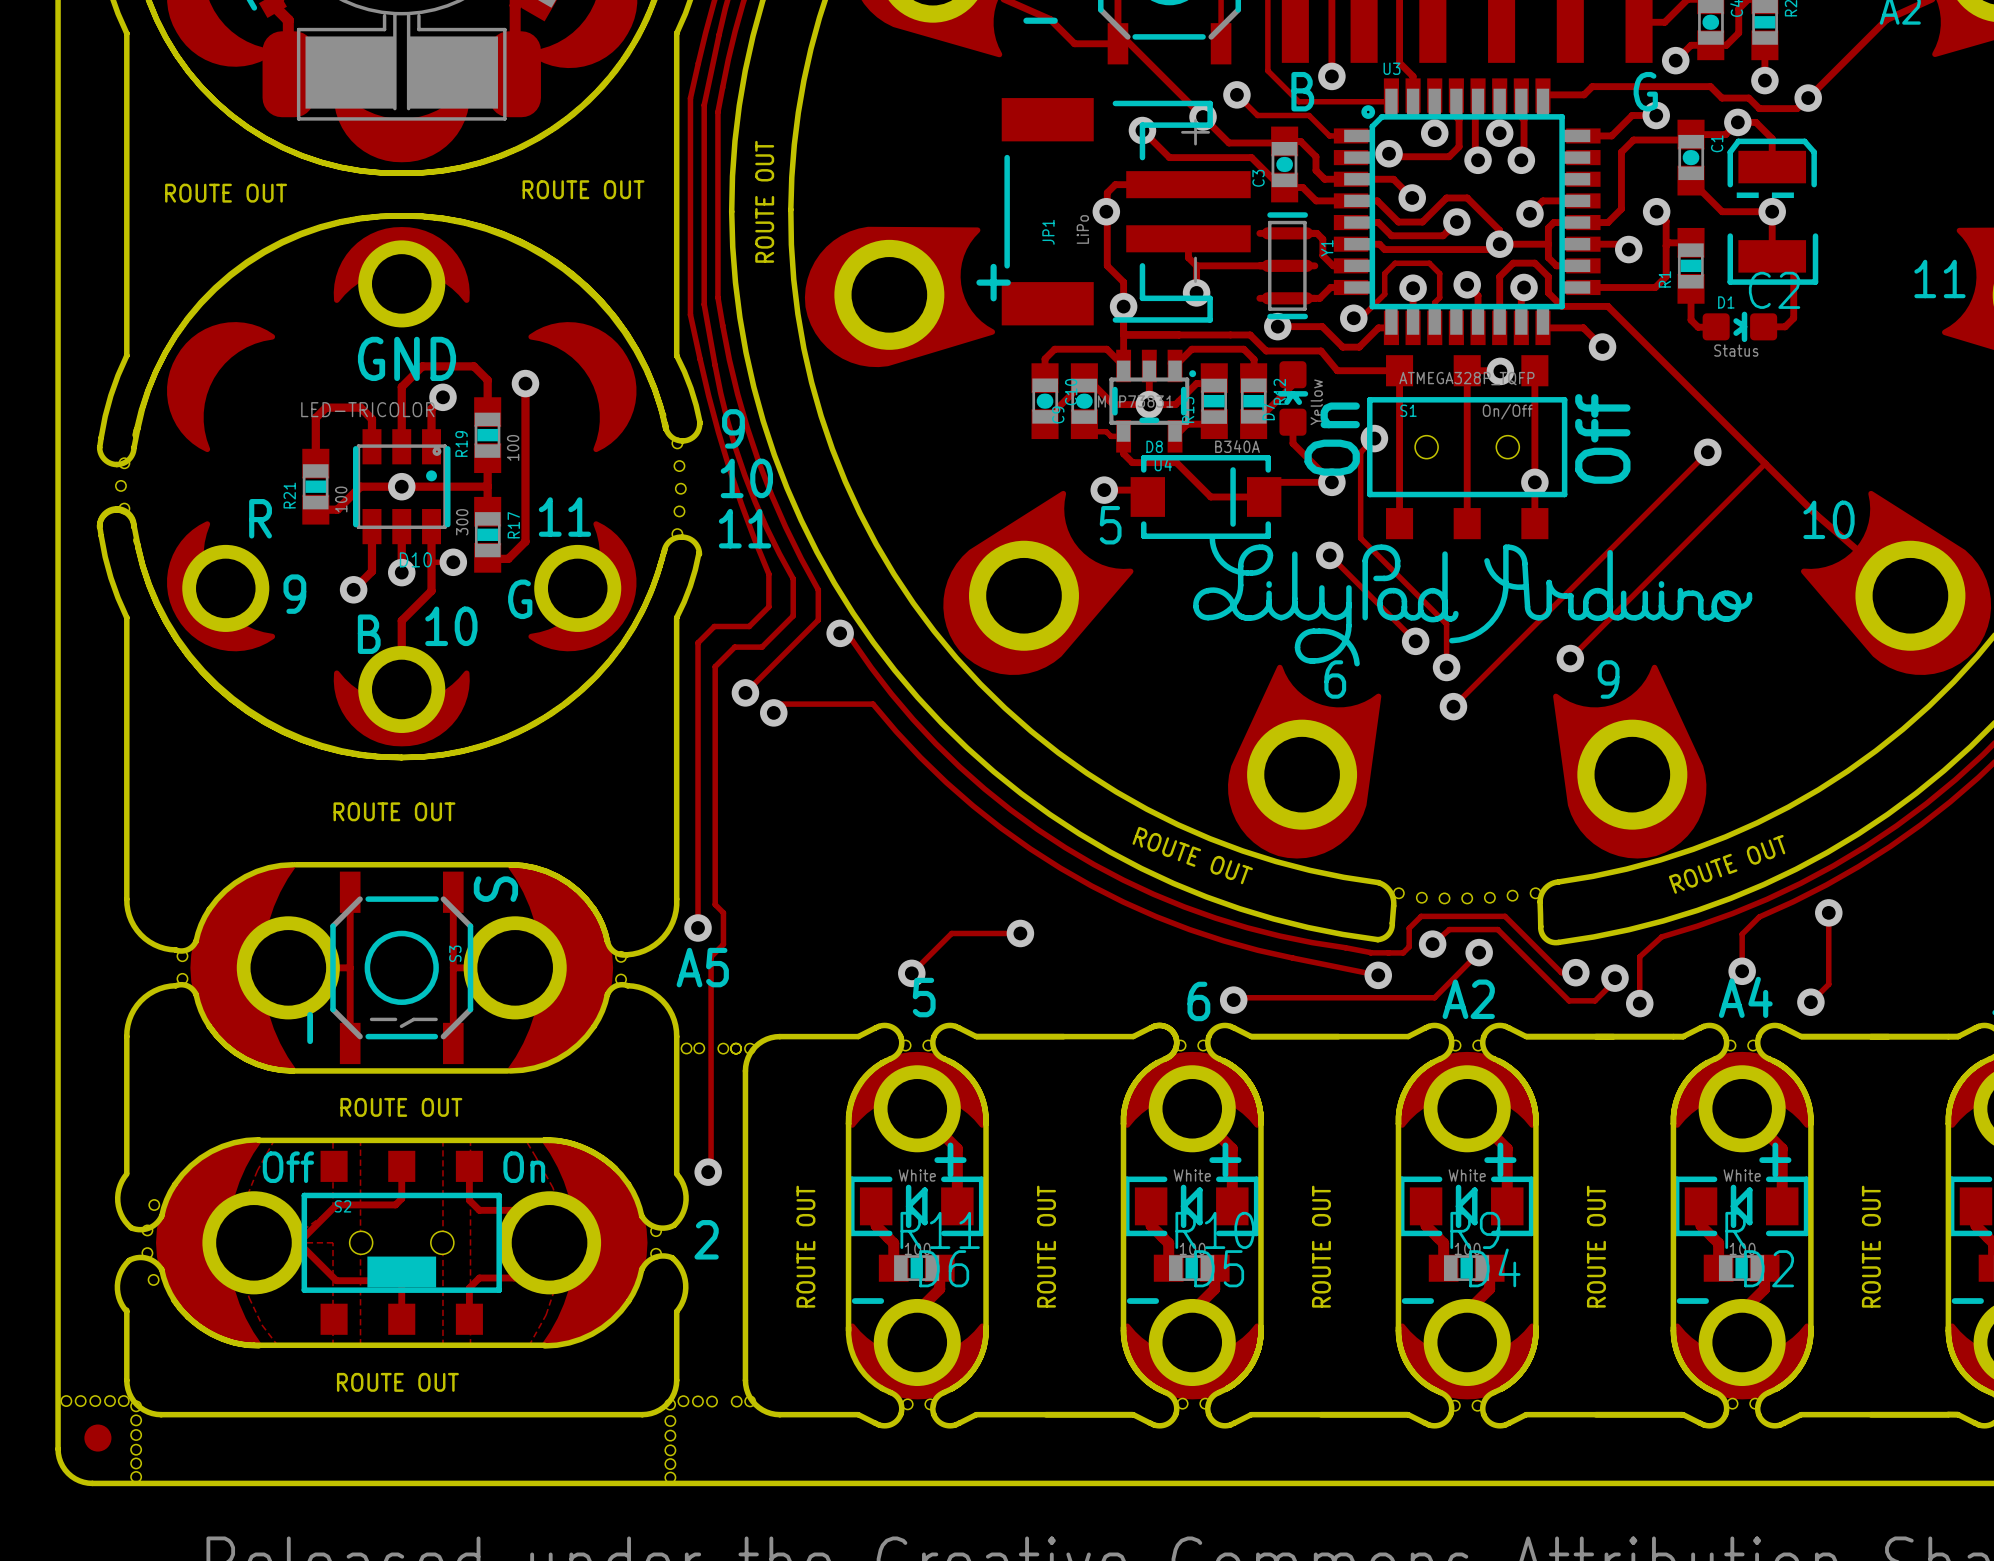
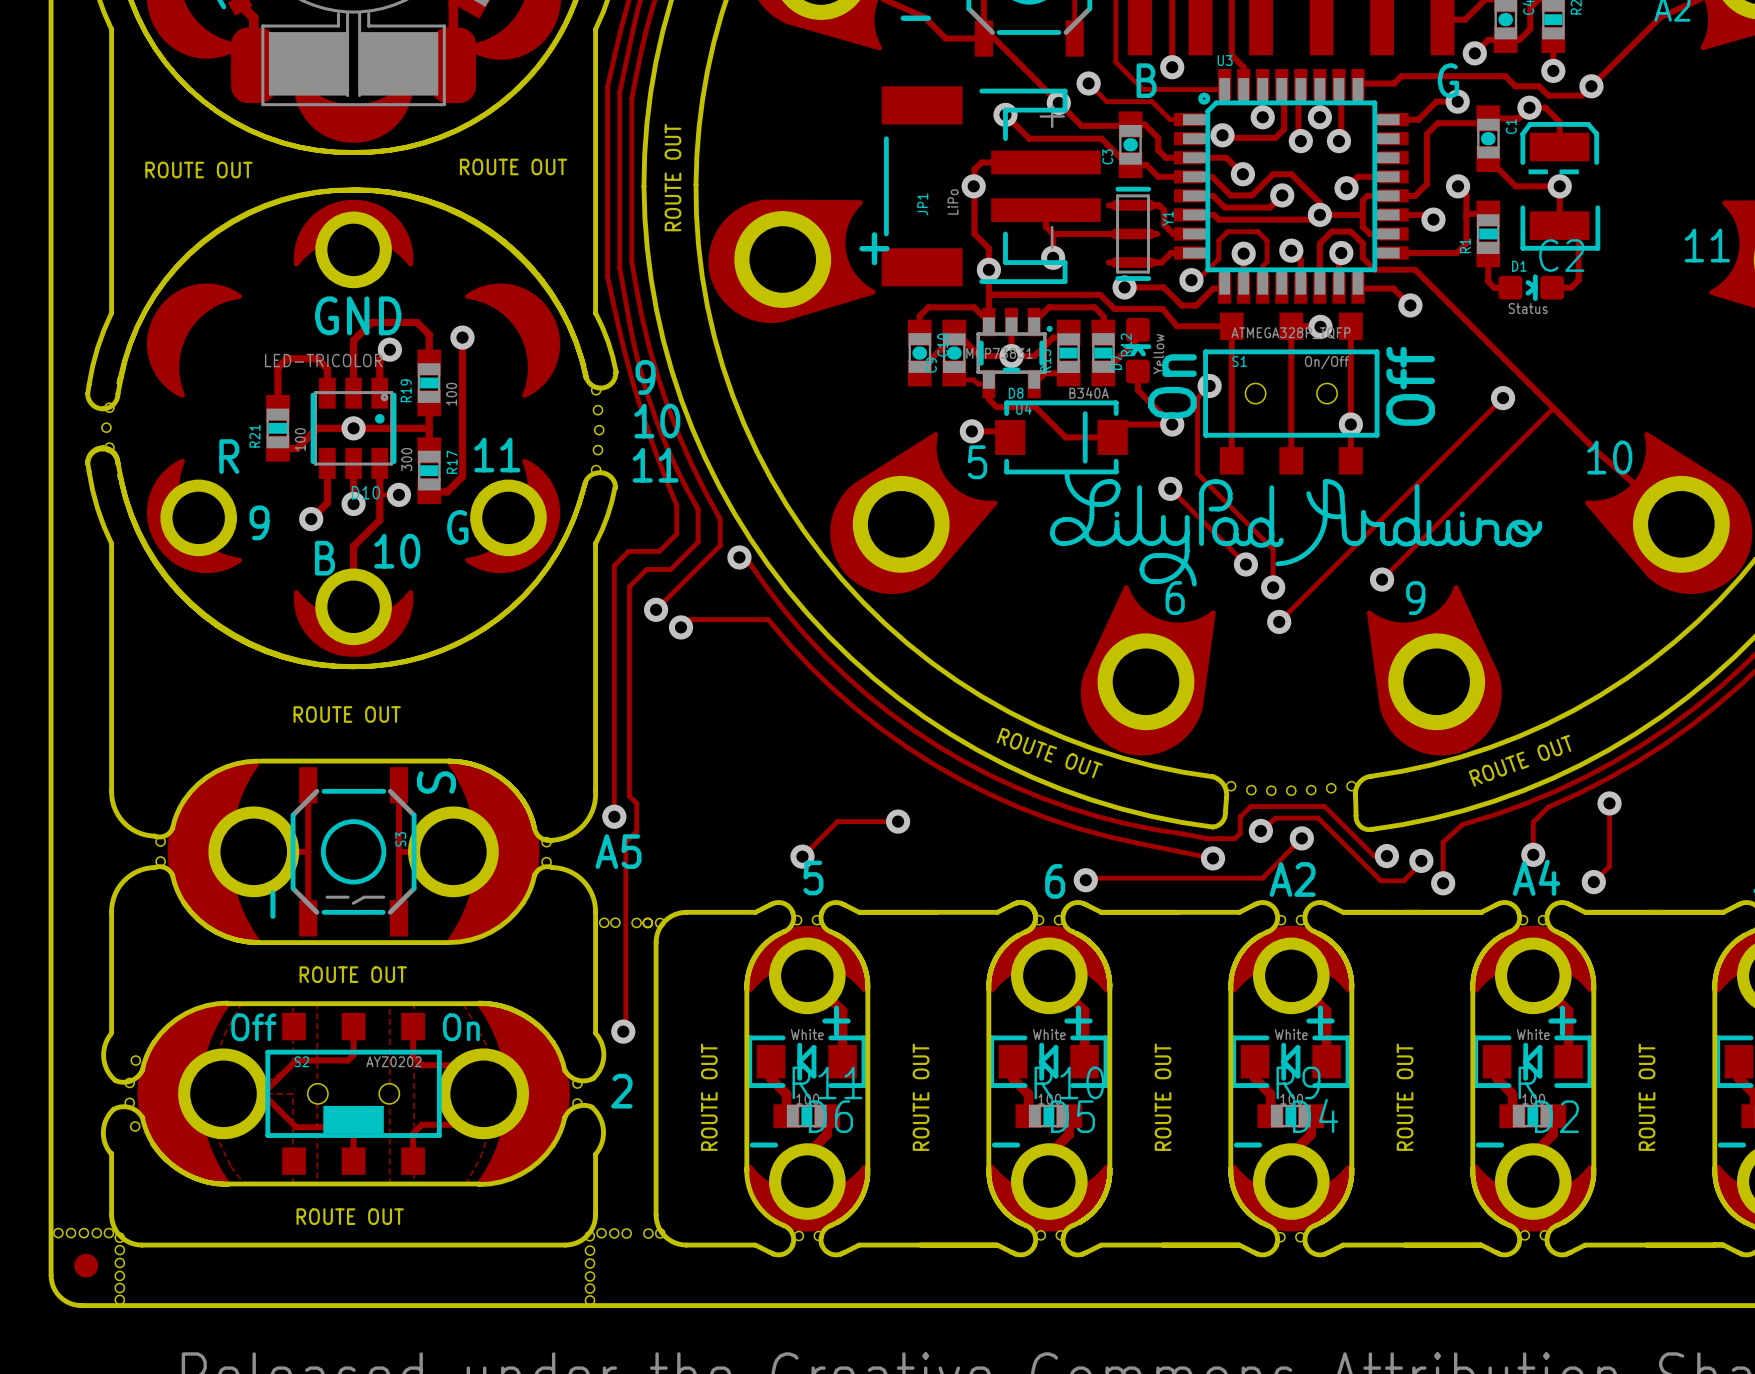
S2 value: none -> AYZ0202 (393, 1061)

